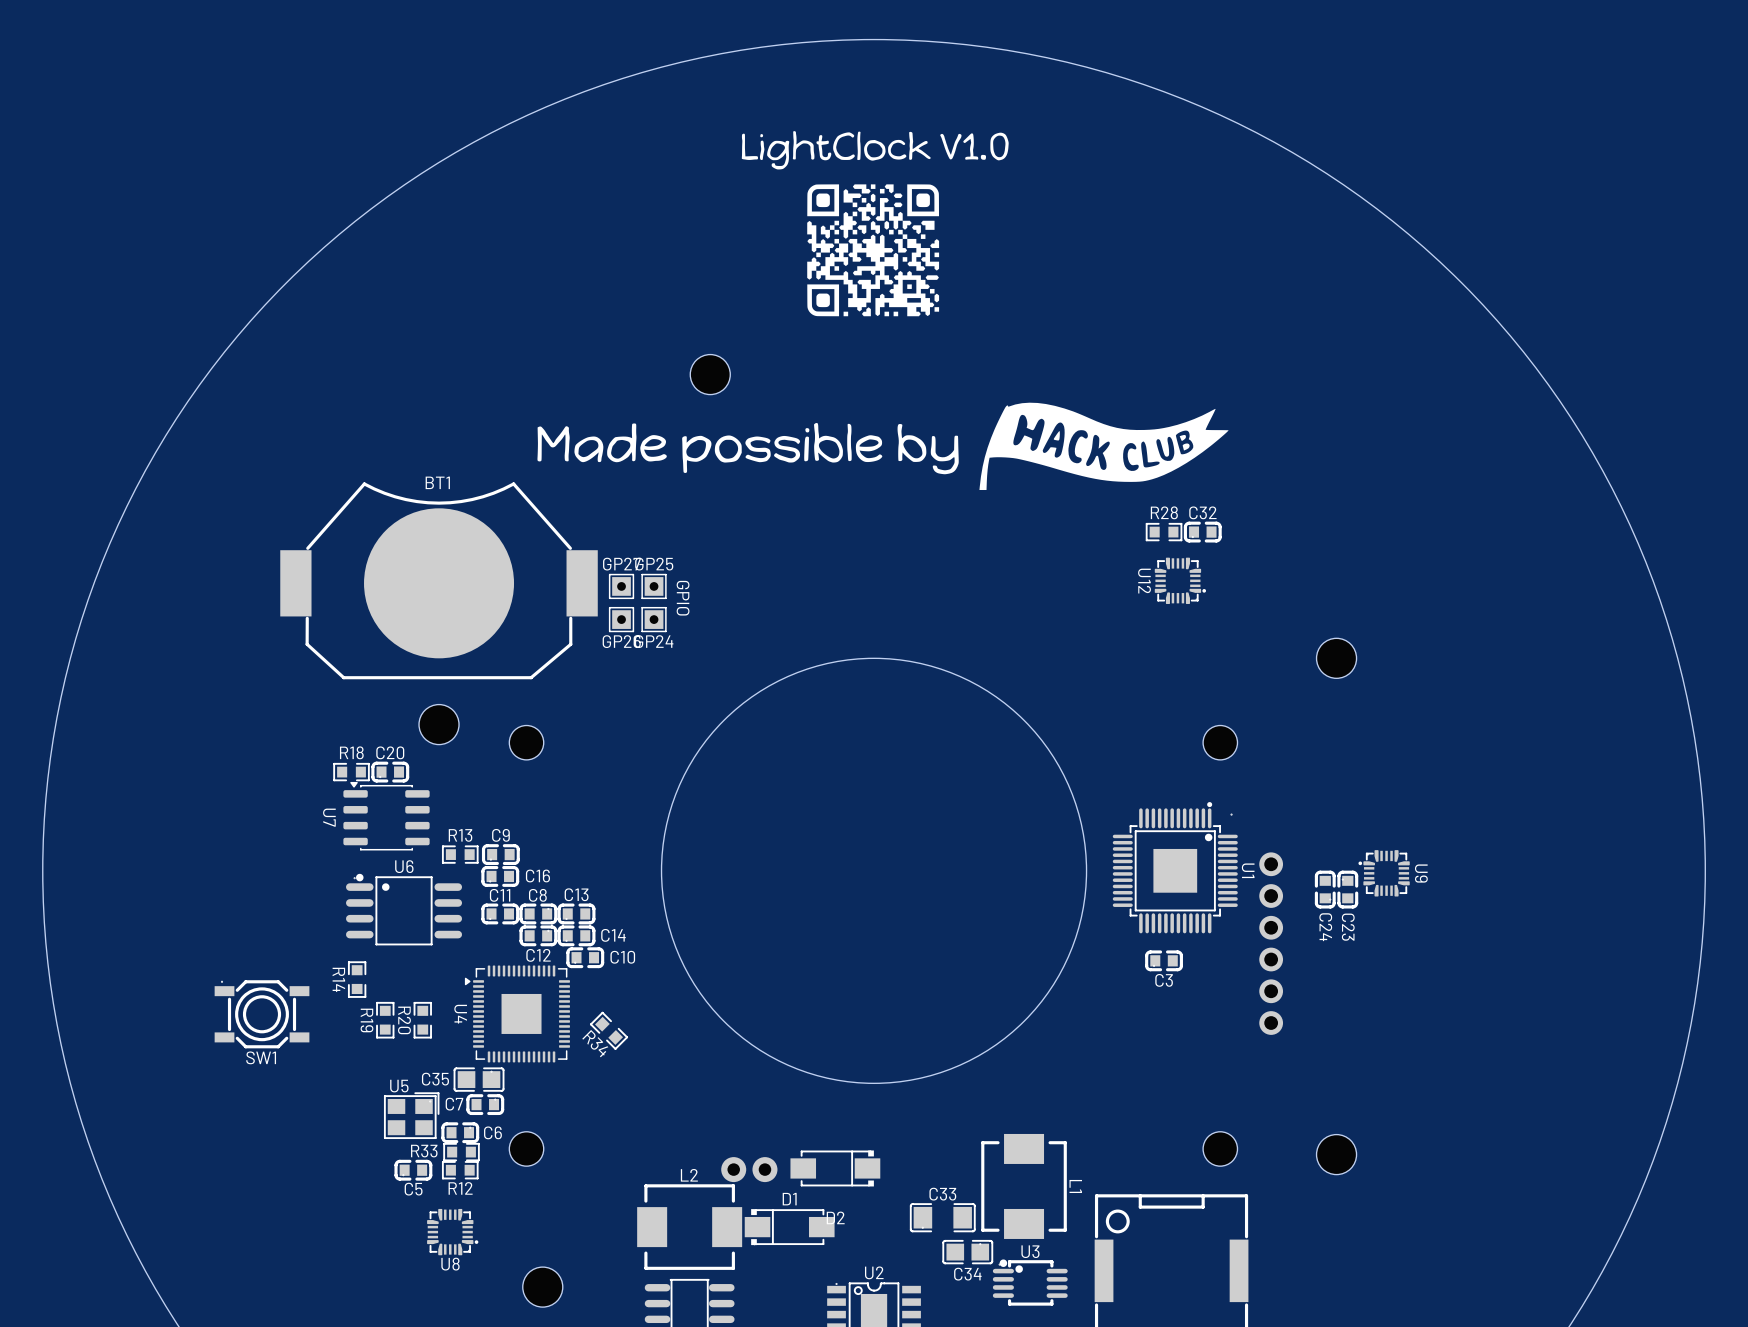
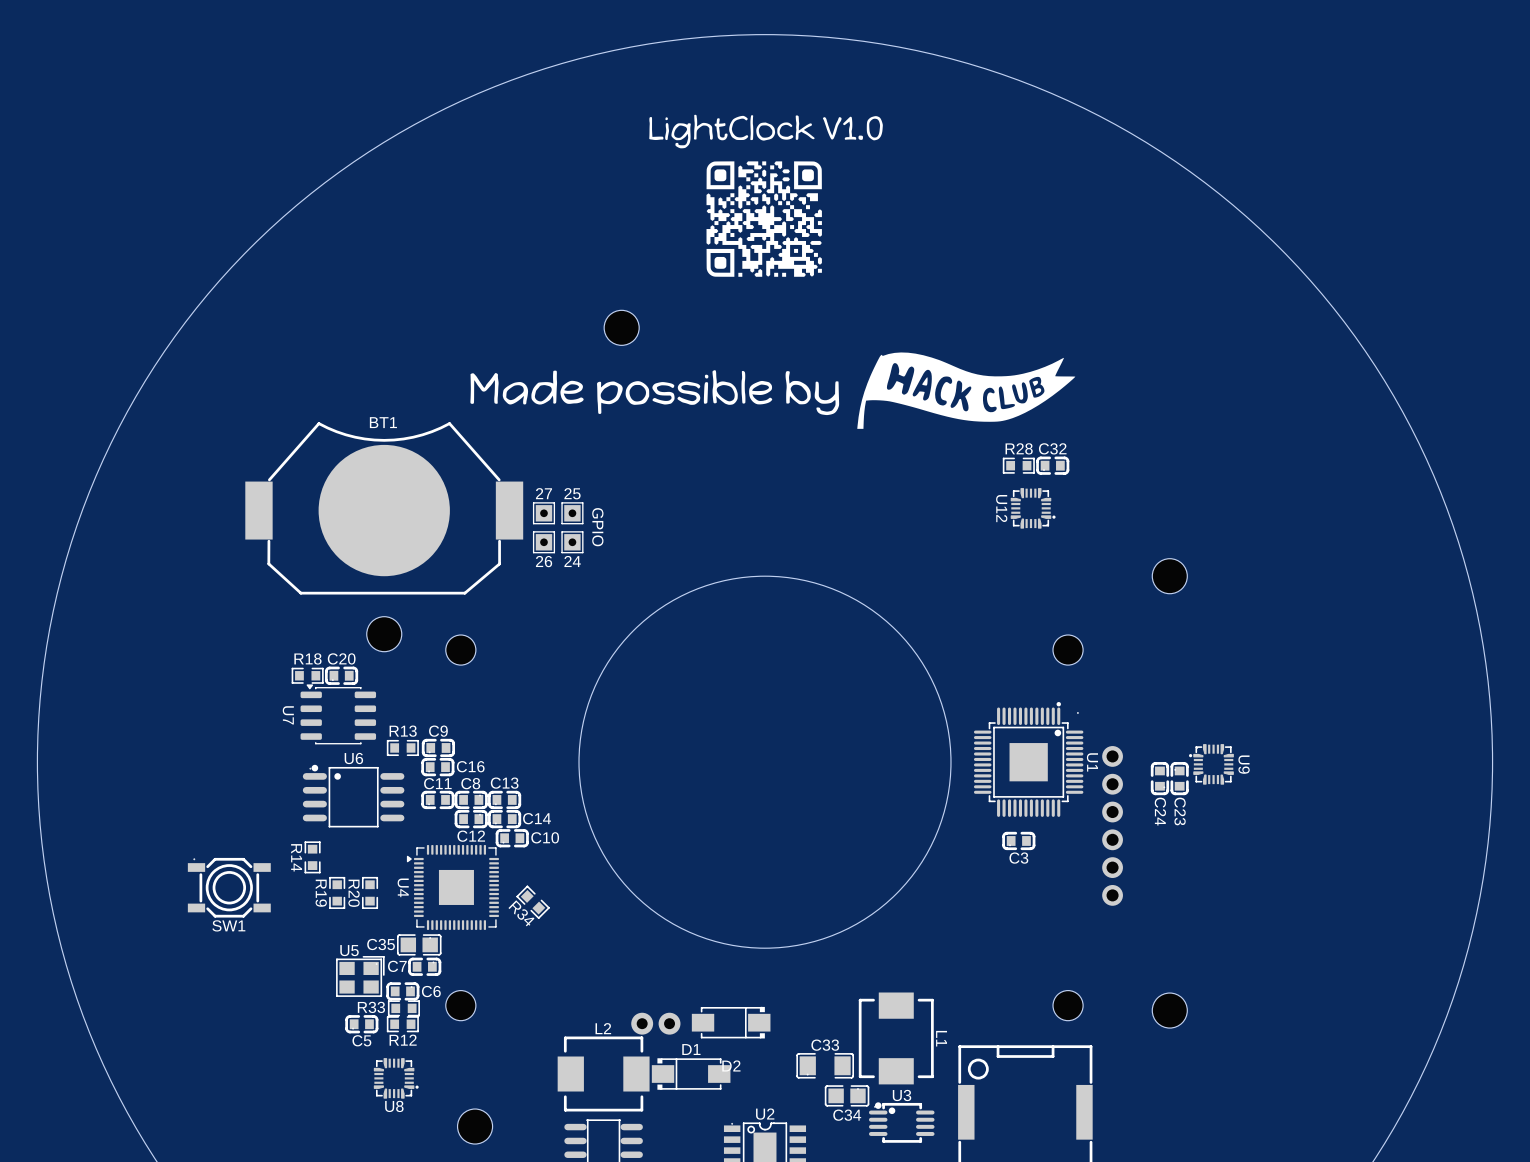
GP27 name: GP27 (621, 564) -> 27 (543, 493)
GP25 name: GP25 (654, 564) -> 25 (572, 493)
GP26 name: GP26 (621, 641) -> 26 (544, 561)
GP24 name: GP24 (654, 641) -> 24 (572, 561)

